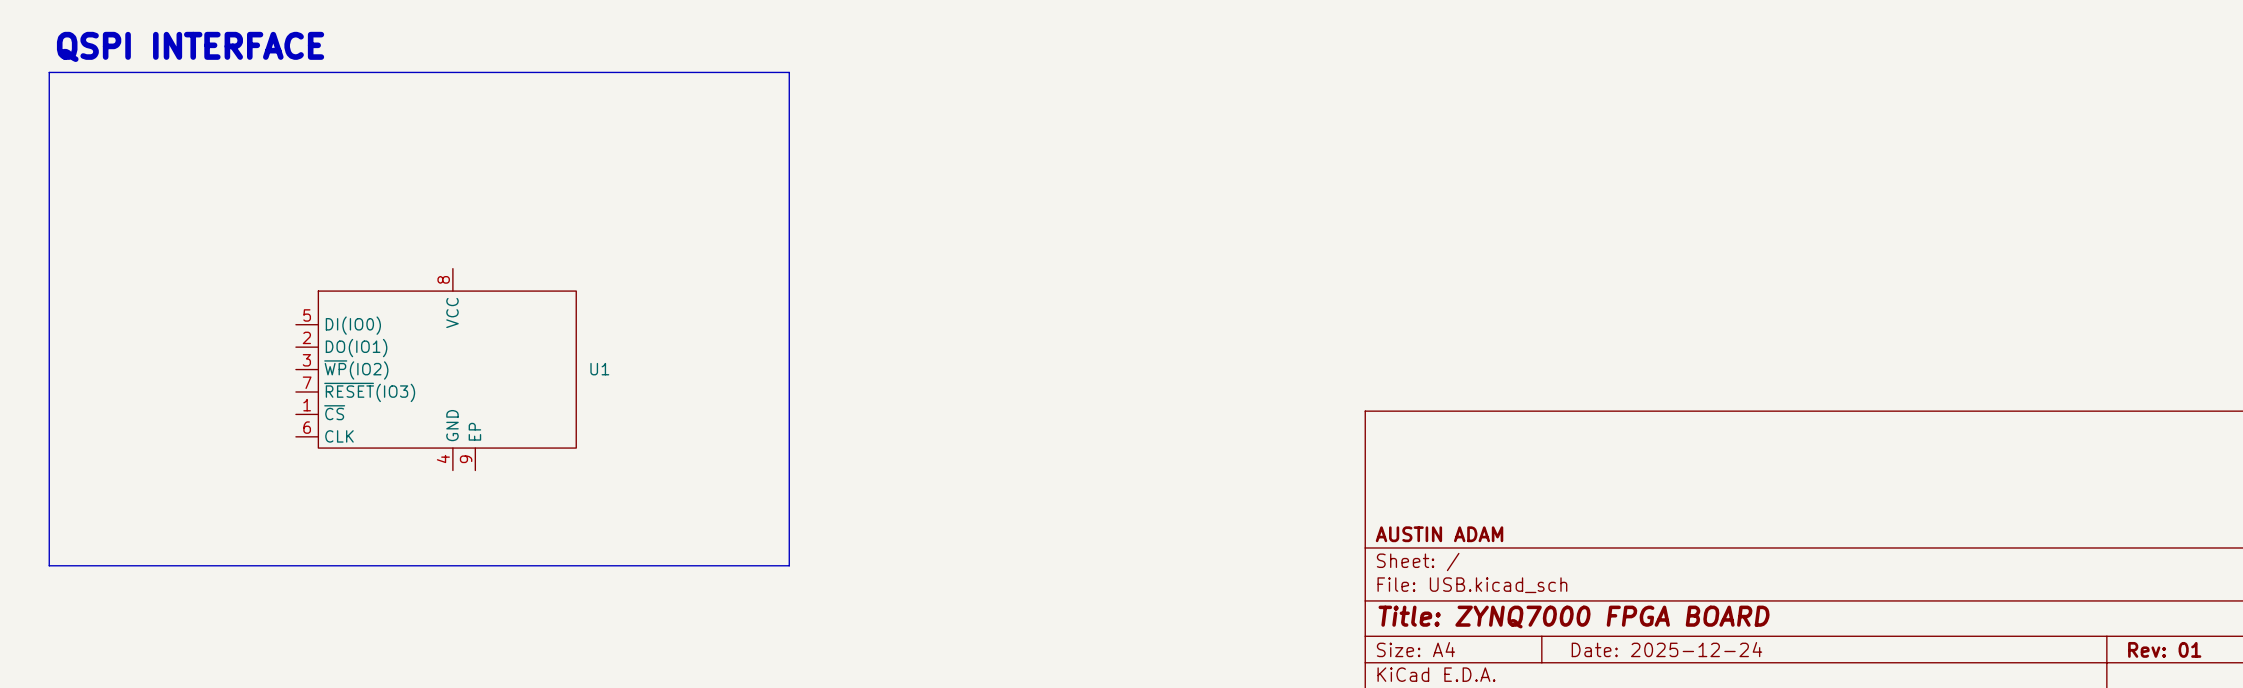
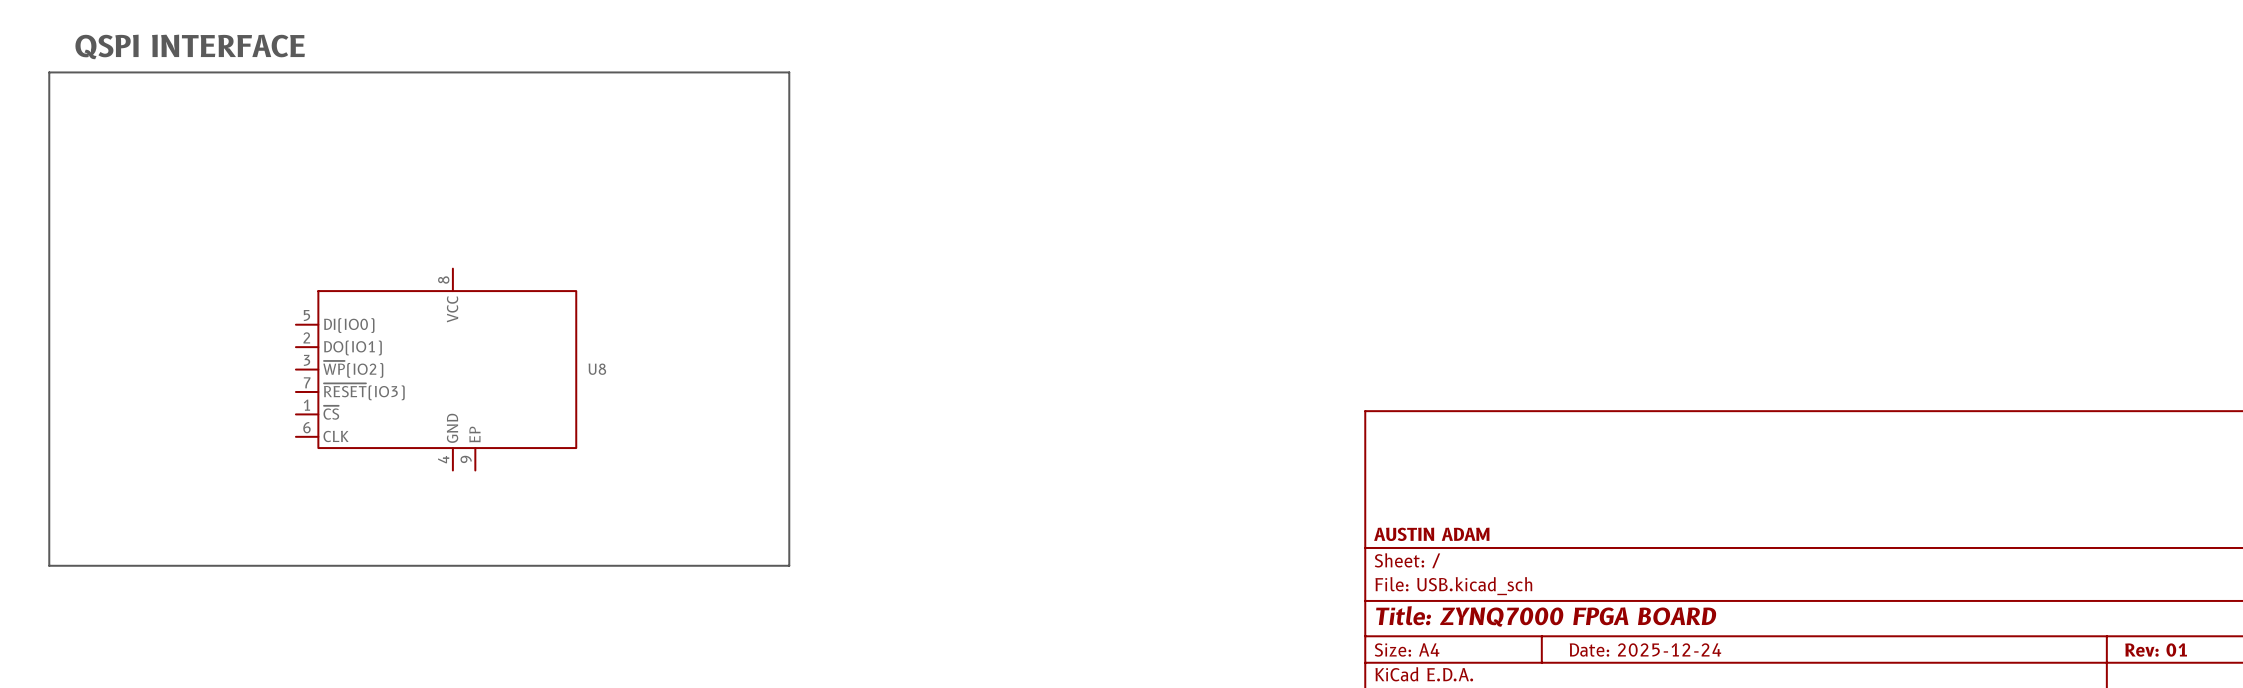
U1 name: U1 (599, 369) -> U8 (597, 369)

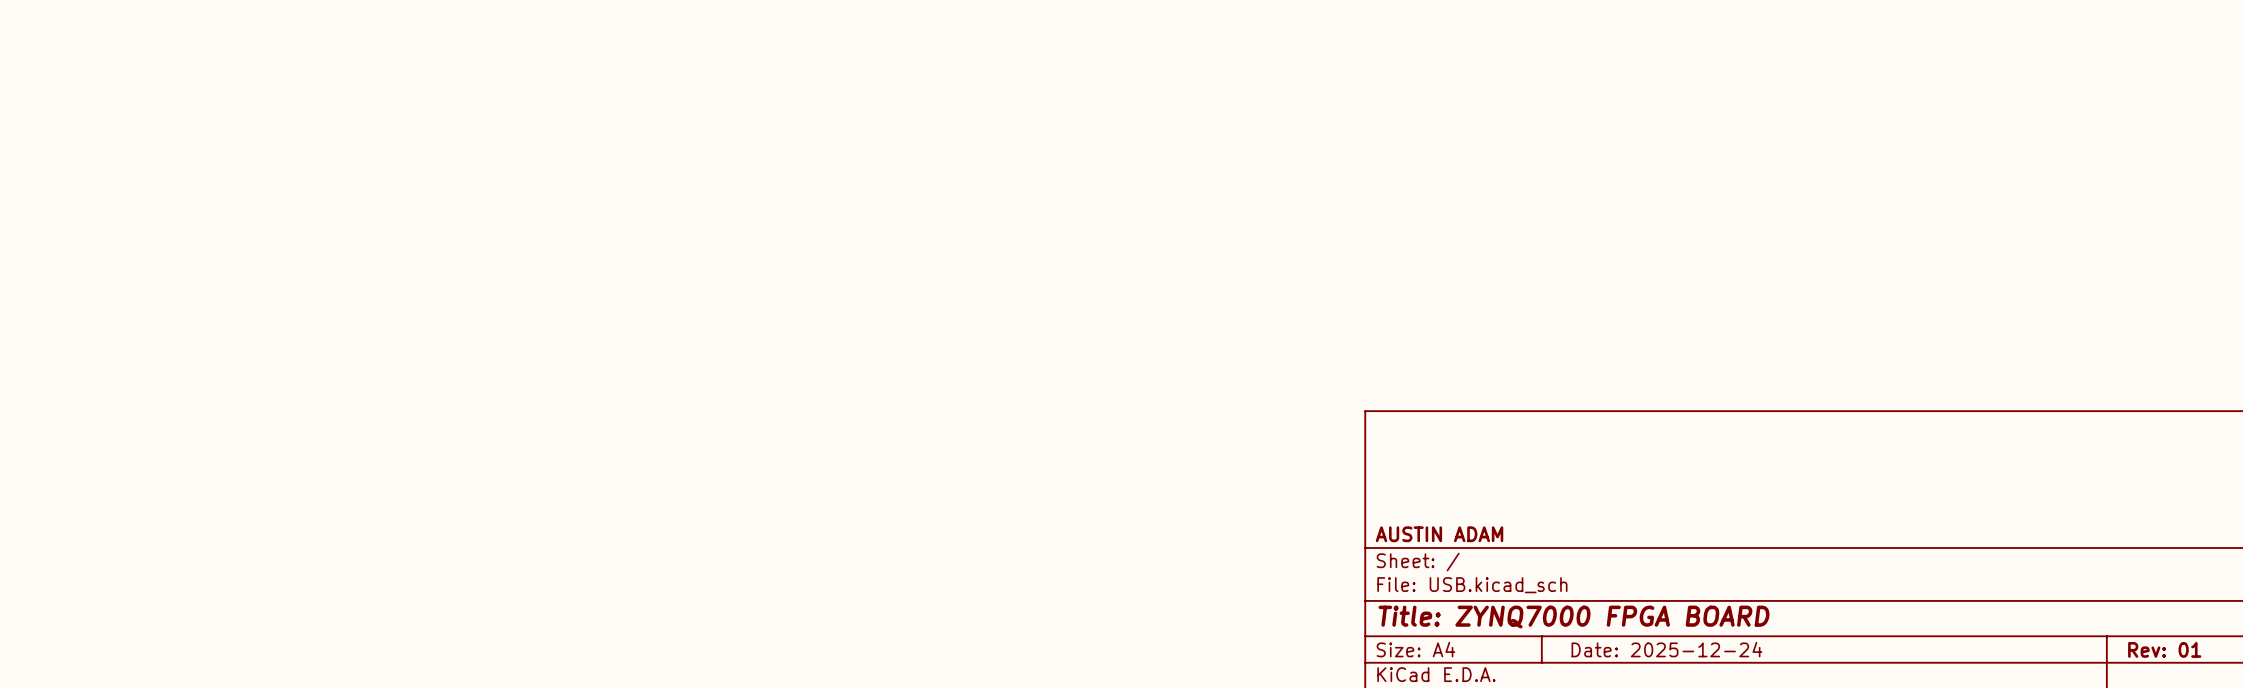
text: QSPI INTERFACE (190, 46) -> none
line: (49, 72) (789, 72) (789, 565) (49, 565) (49, 72) -> none
U8: (436, 369) -> none

